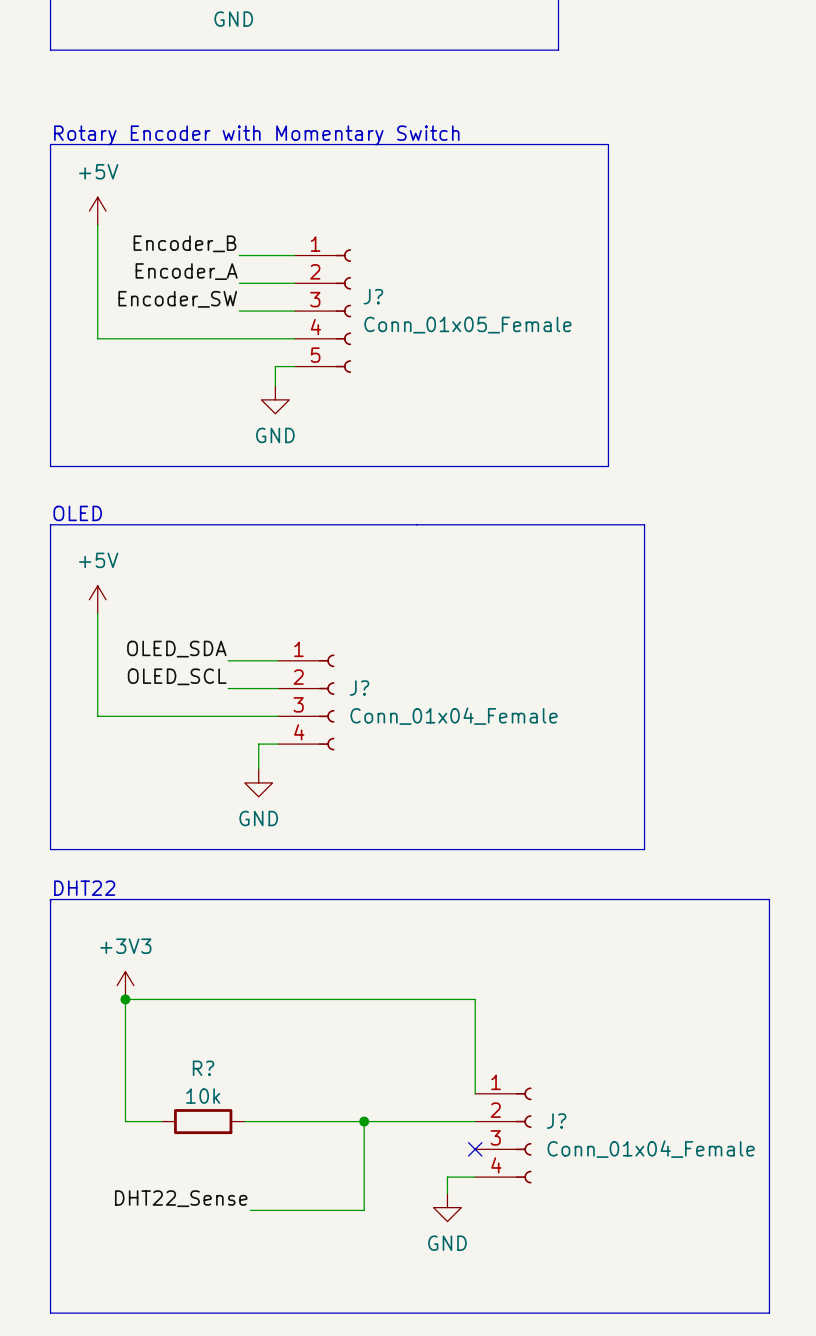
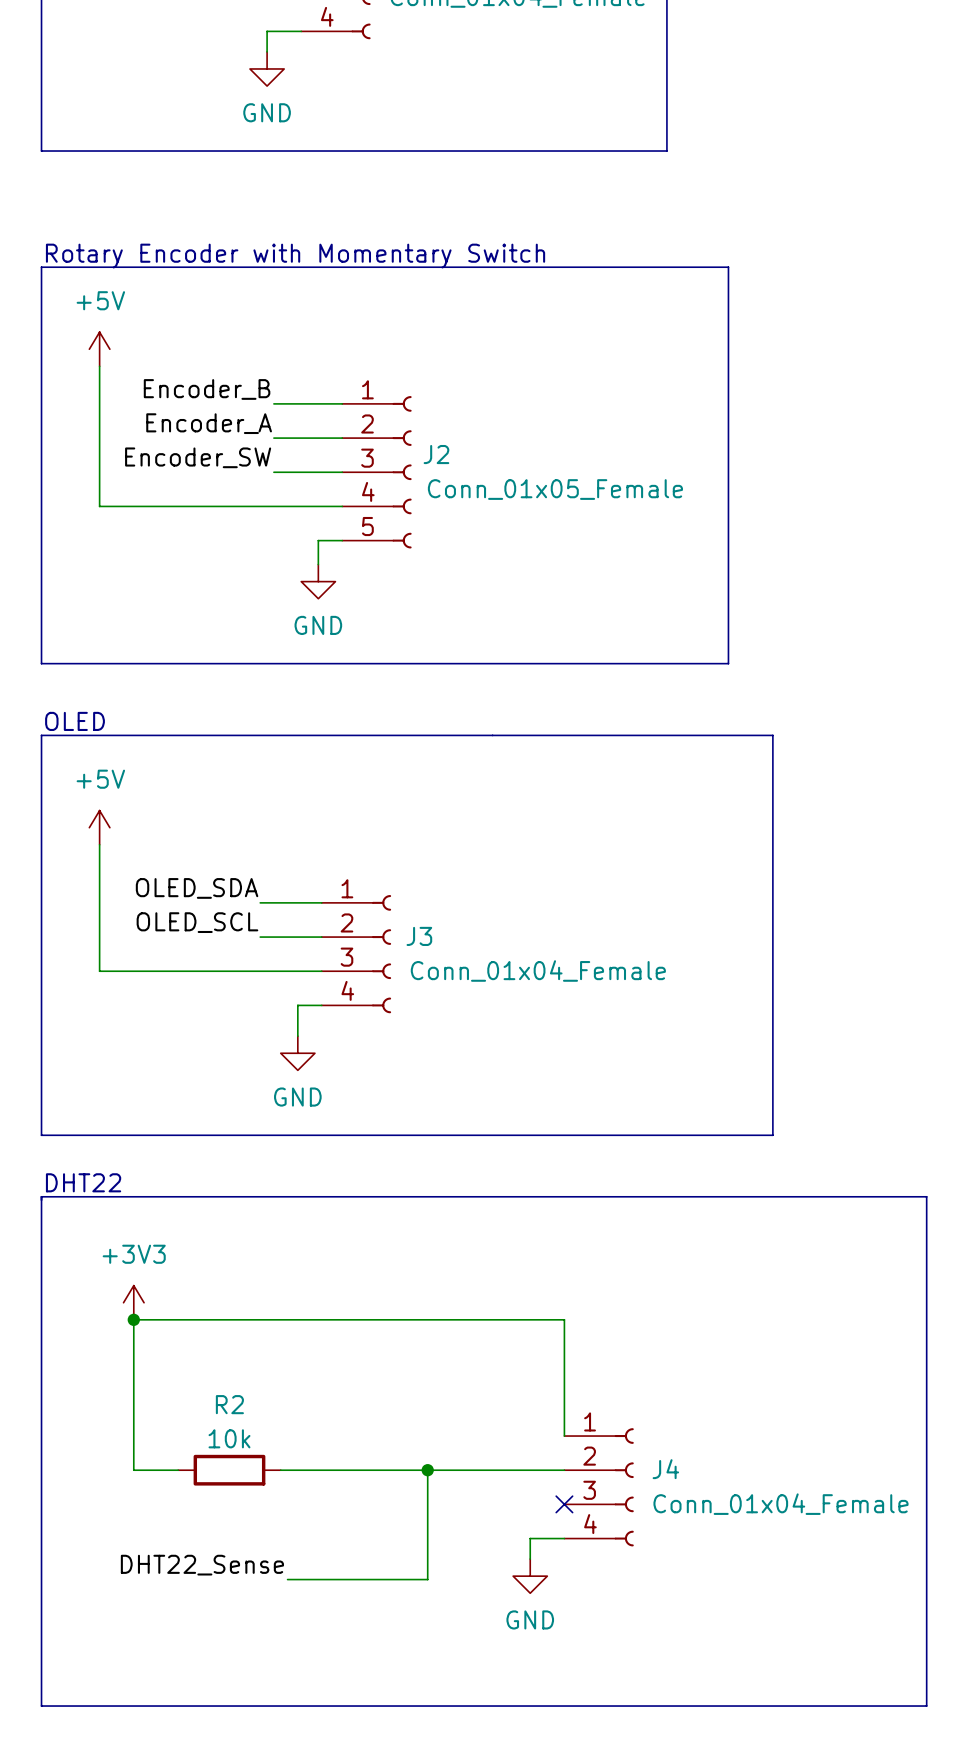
J? name: J? (373, 296) -> J2 (436, 454)
J? name: J? (359, 688) -> J3 (419, 936)
R? name: R? (203, 1068) -> R2 (229, 1404)
J? name: J? (556, 1121) -> J4 (665, 1469)

